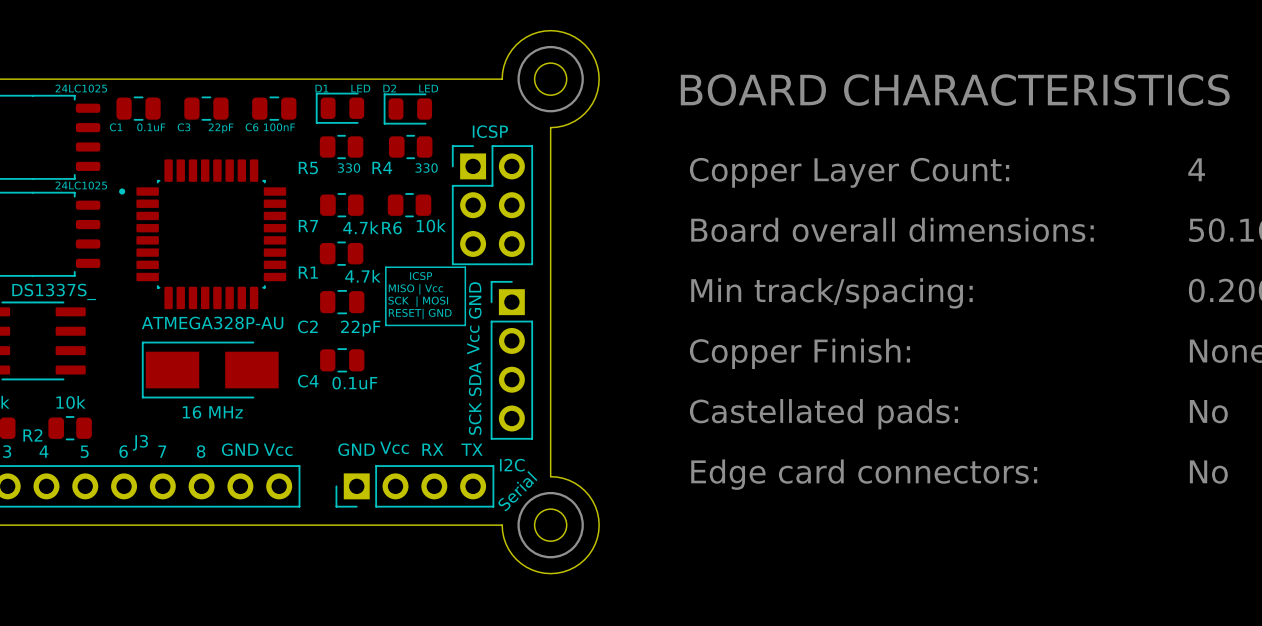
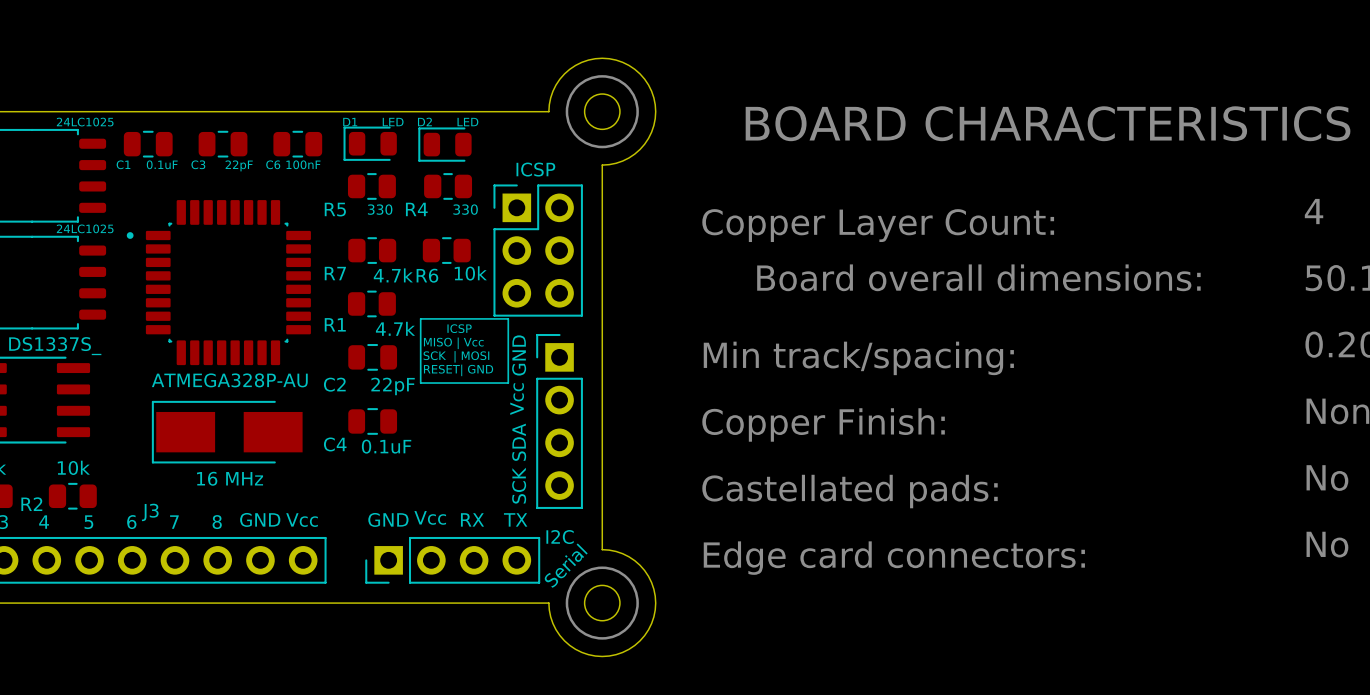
text position: Copper Layer Count: (849, 172) -> Copper Layer Count: (878, 225)
text position: Min track/spacing: (831, 293) -> Min track/spacing: (858, 358)
text position: Copper Finish: (799, 353) -> Copper Finish: (823, 424)
text position: Castellated pads: (823, 414) -> Castellated pads: (850, 491)
text position: Edge card connectors: (864, 474) -> Edge card connectors: (894, 558)

